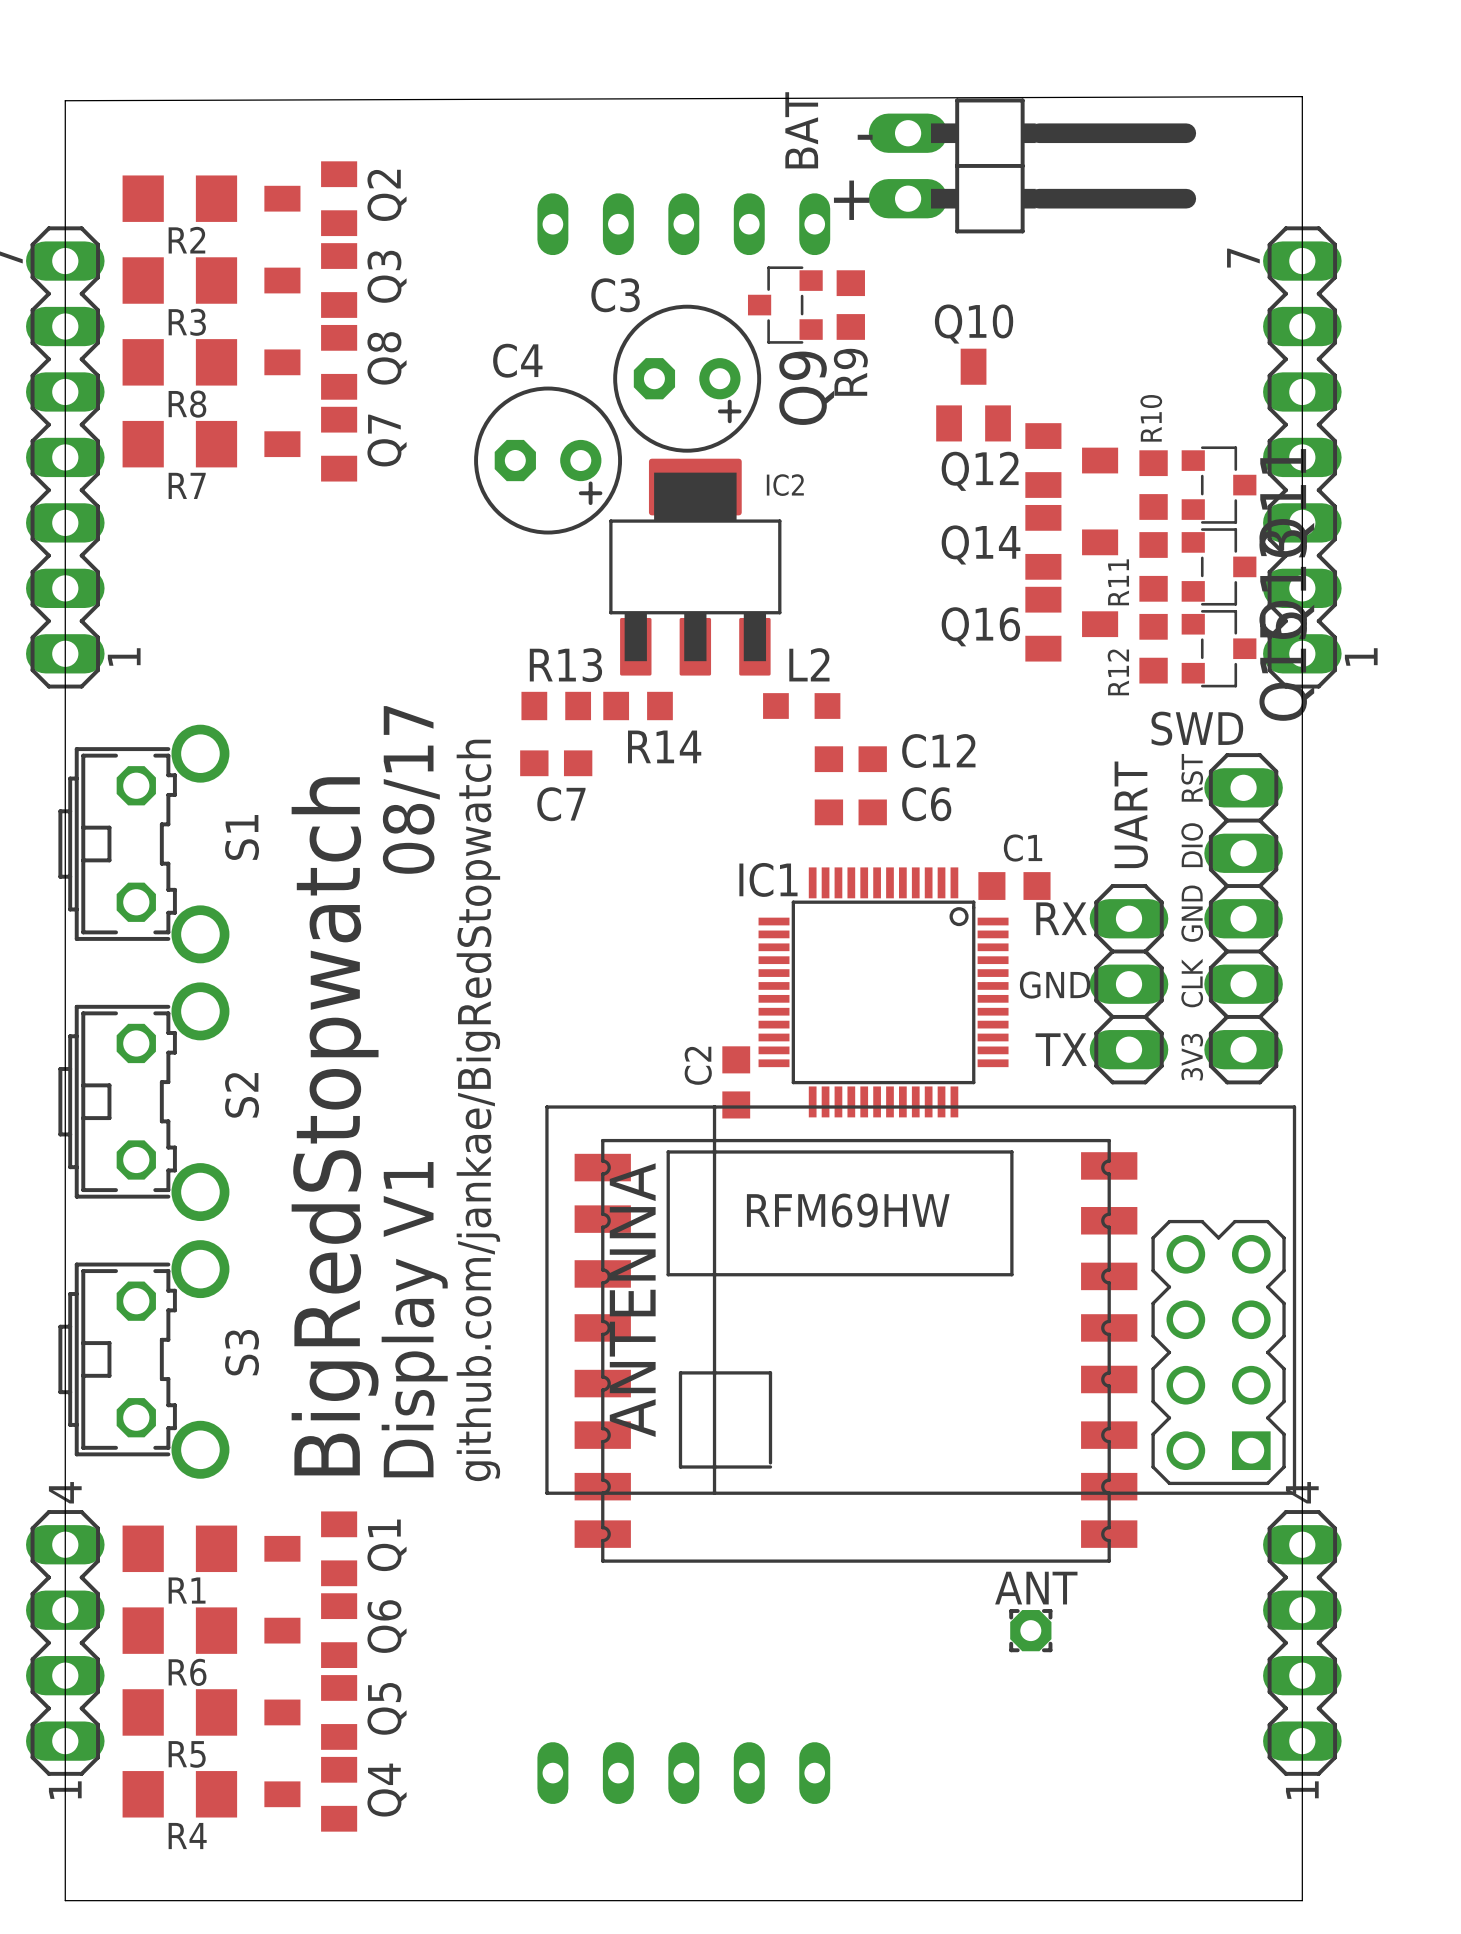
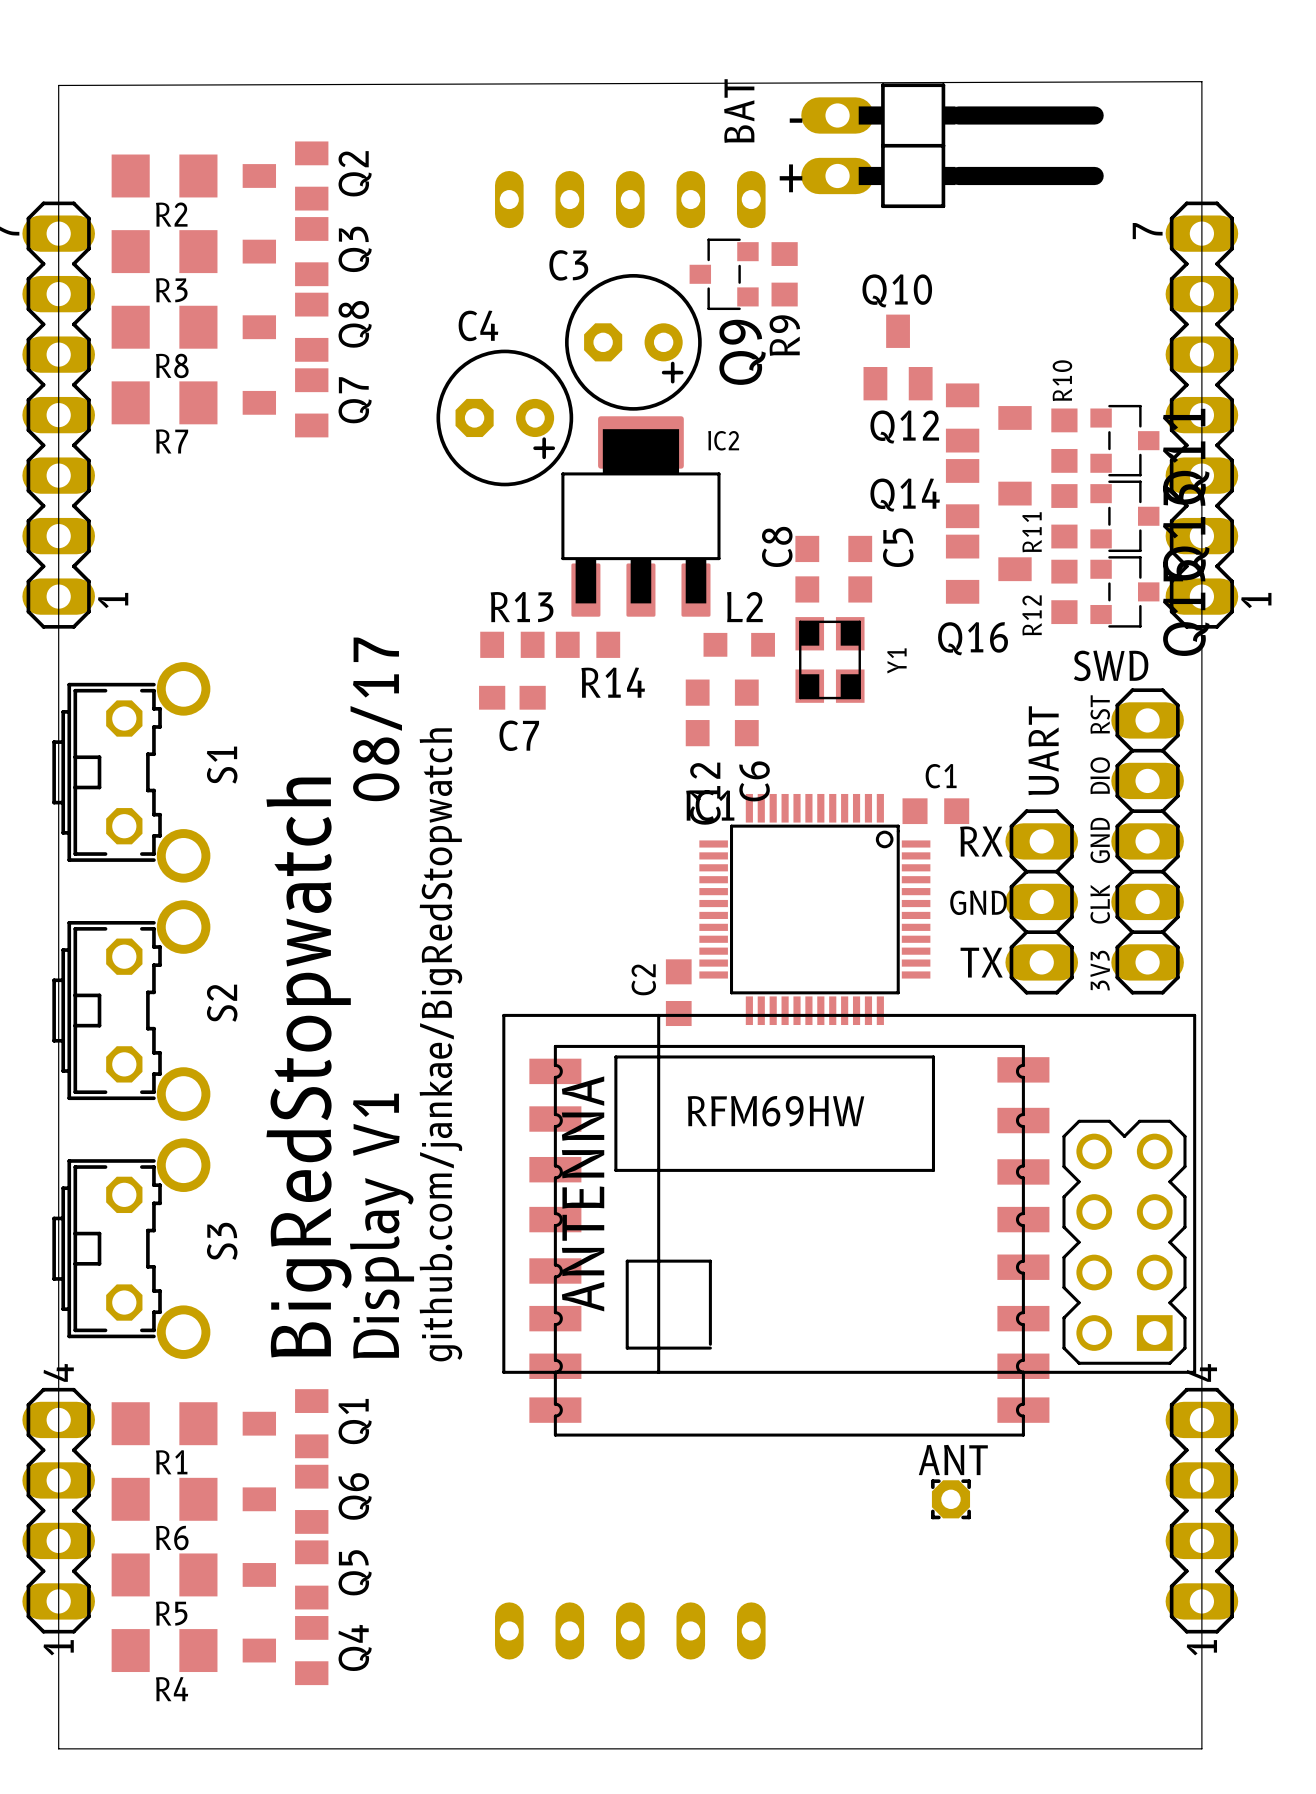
C8: none -> (807, 569)
C5: none -> (860, 569)
Q16 name position: Q16 (980, 626) -> Q16 (973, 638)
Y1: none -> (829, 659)
C12 rotation: 0° (850, 759) -> 90° clockwise (697, 712)
C12 position: (850, 759) -> (697, 712)
C6 rotation: 0° (850, 812) -> 90° clockwise (746, 712)
C6 position: (850, 812) -> (746, 712)

